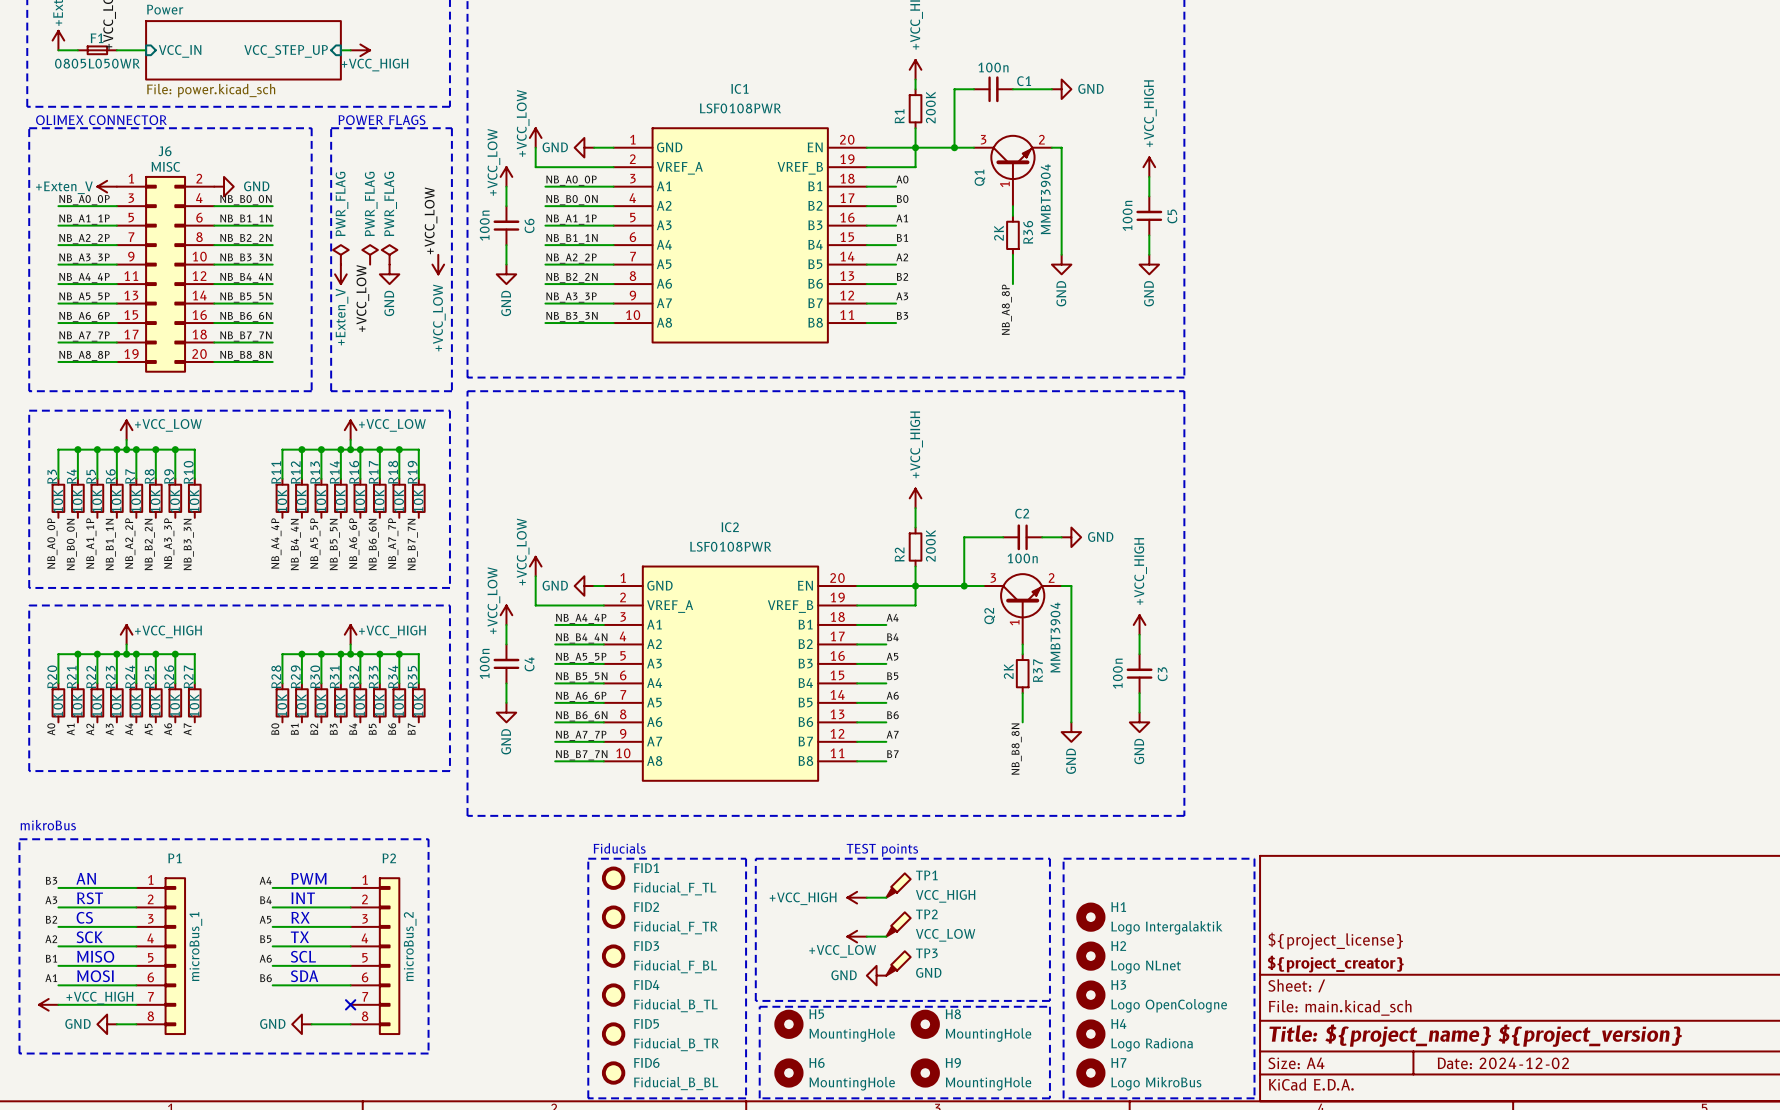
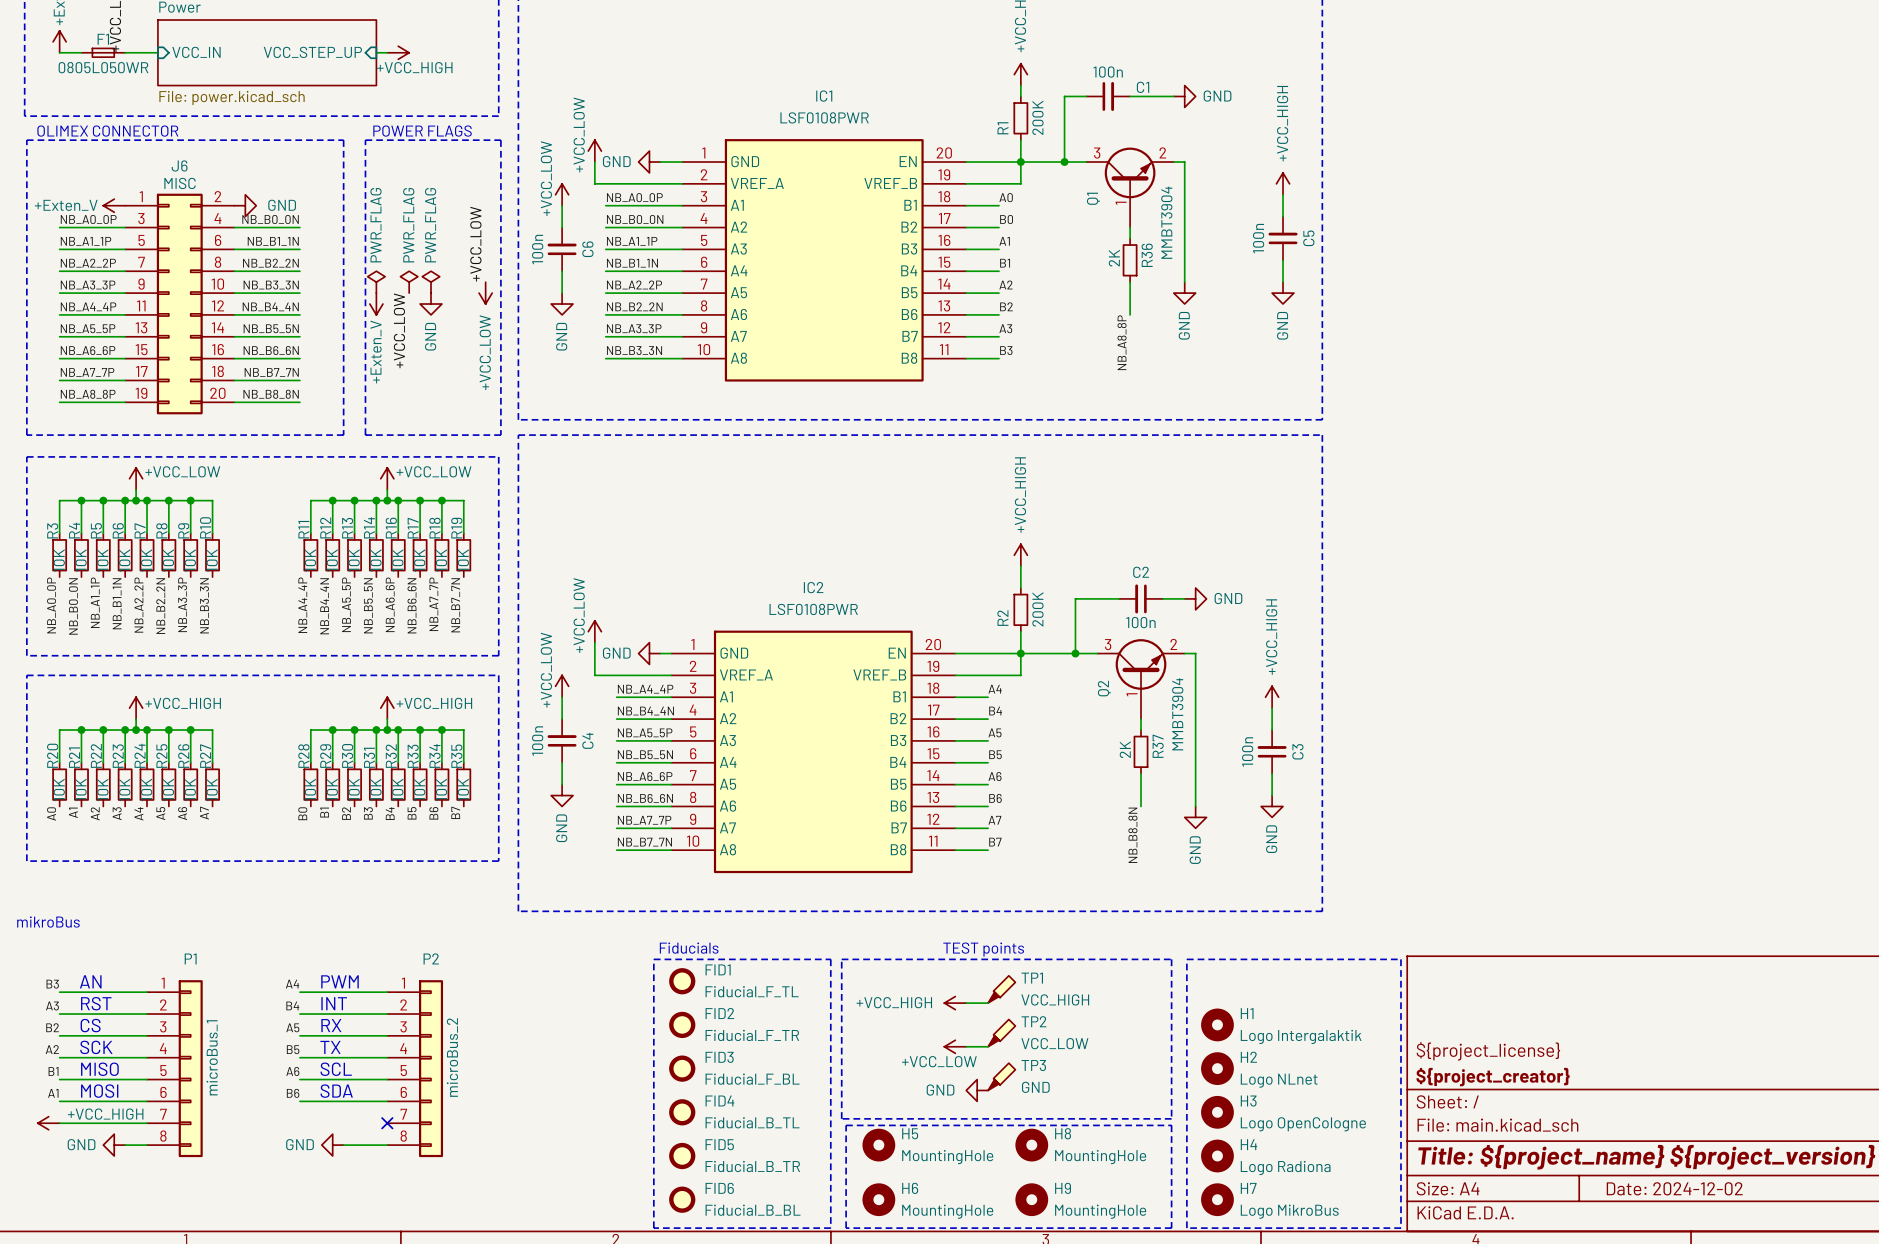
line: (19, 839) (428, 839) (428, 1053) (19, 1053) (19, 839) -> none

